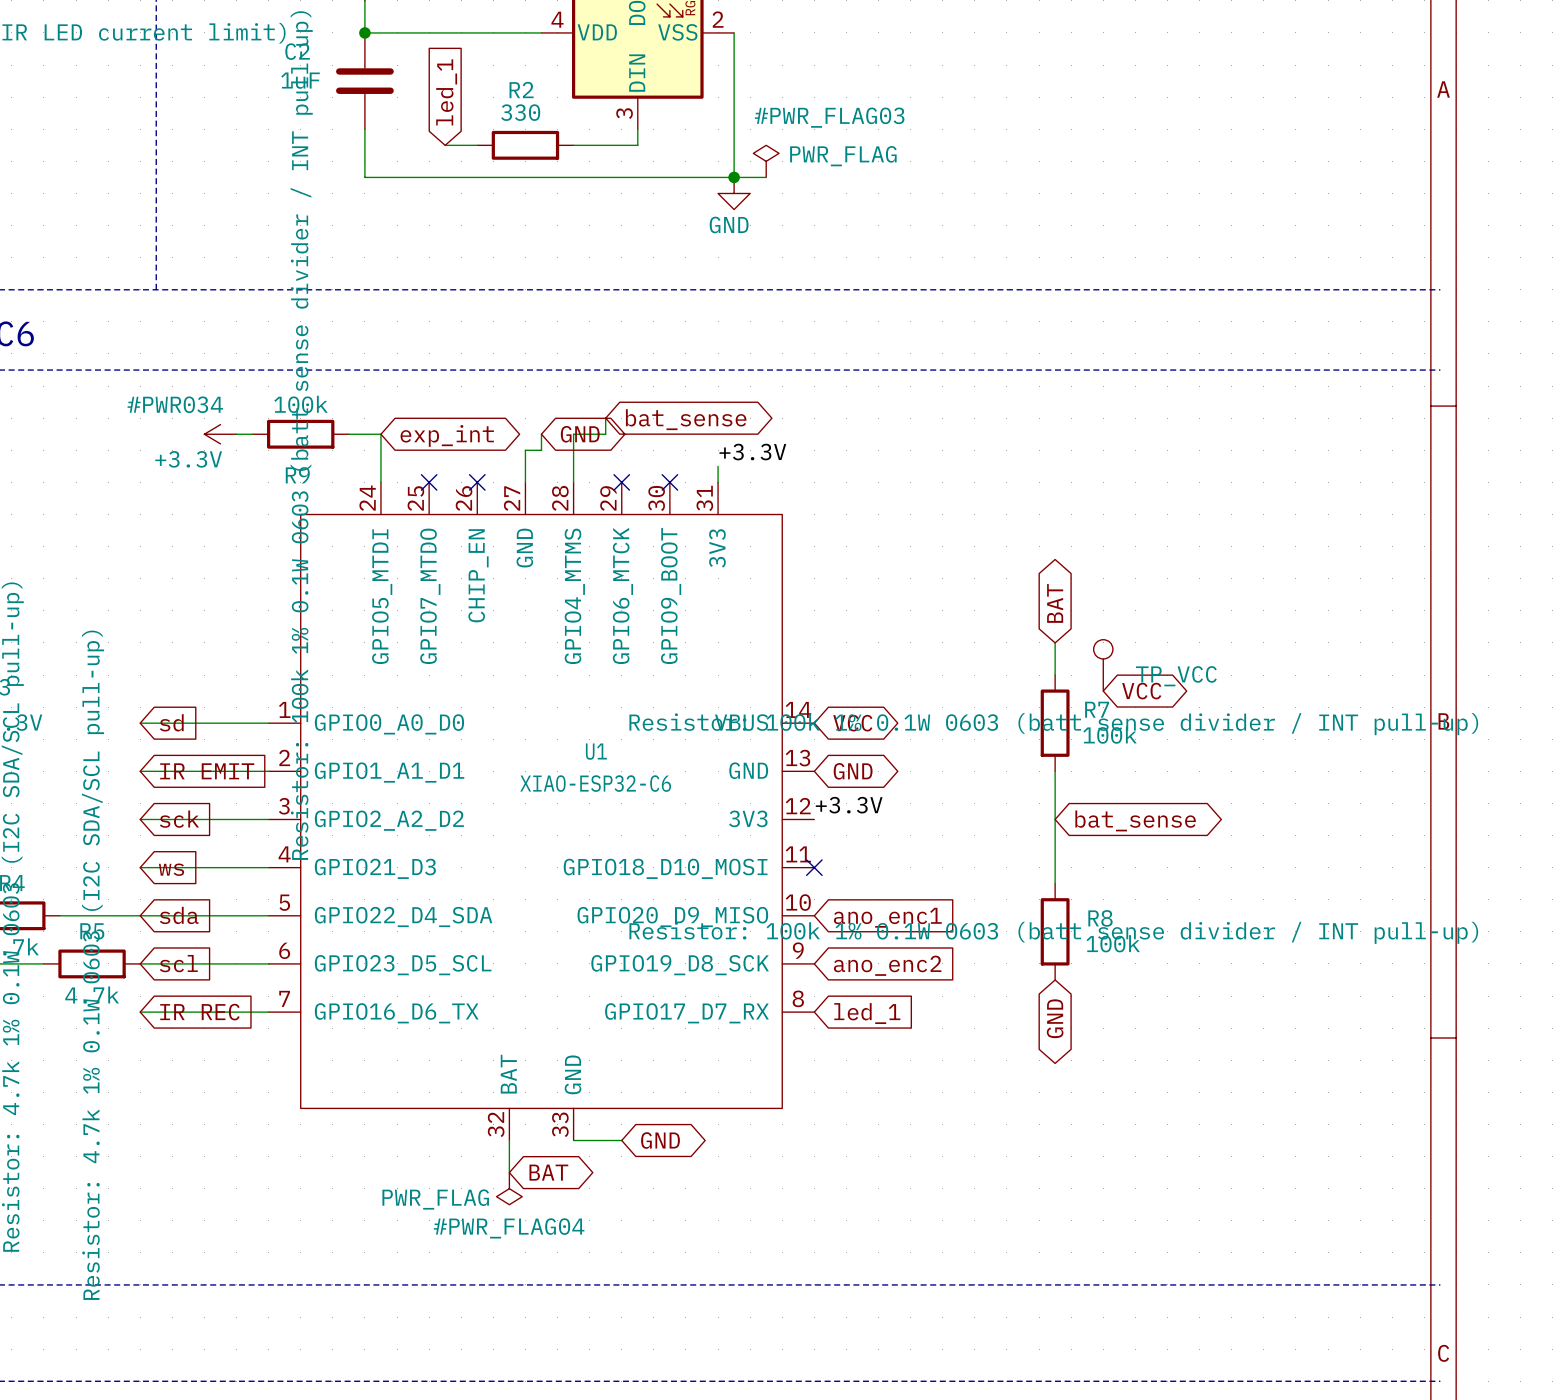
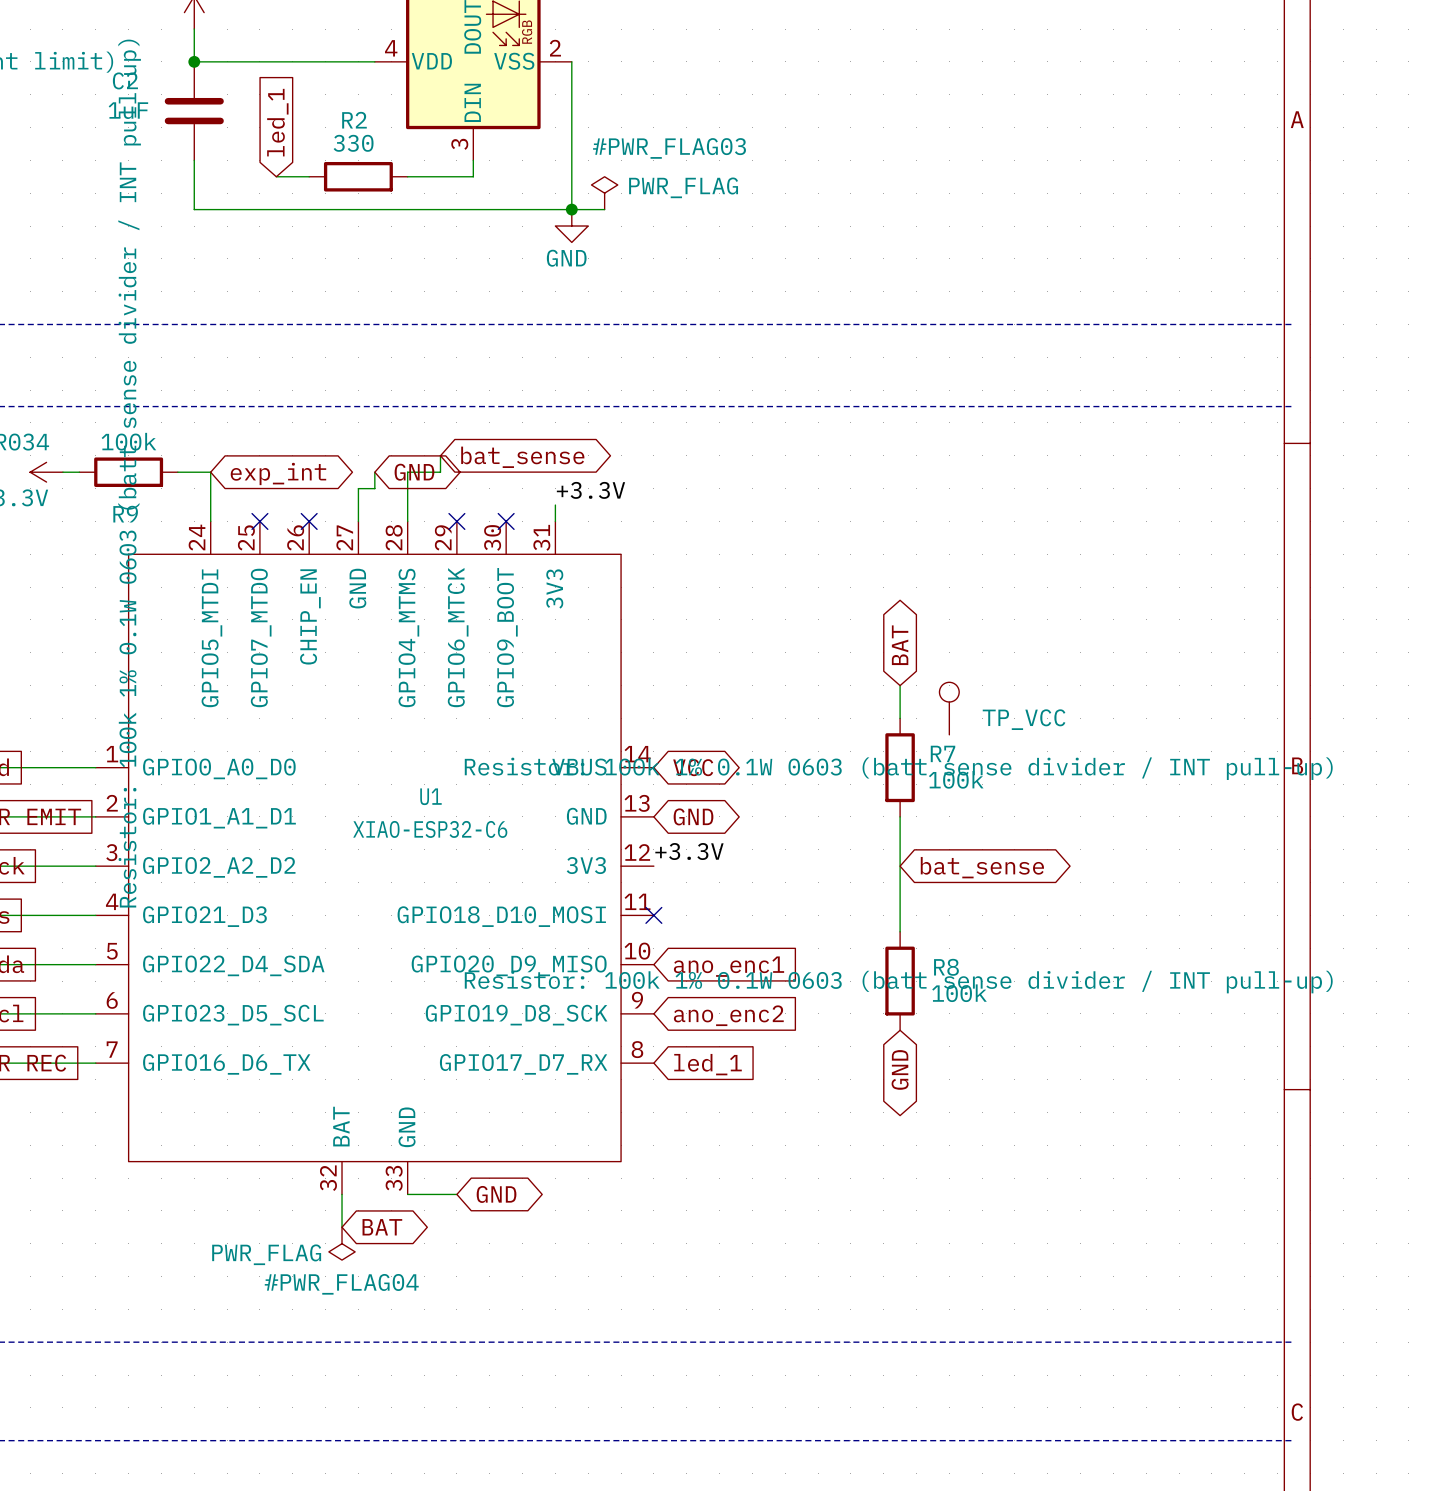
global label: VCC (1141, 691) -> none

